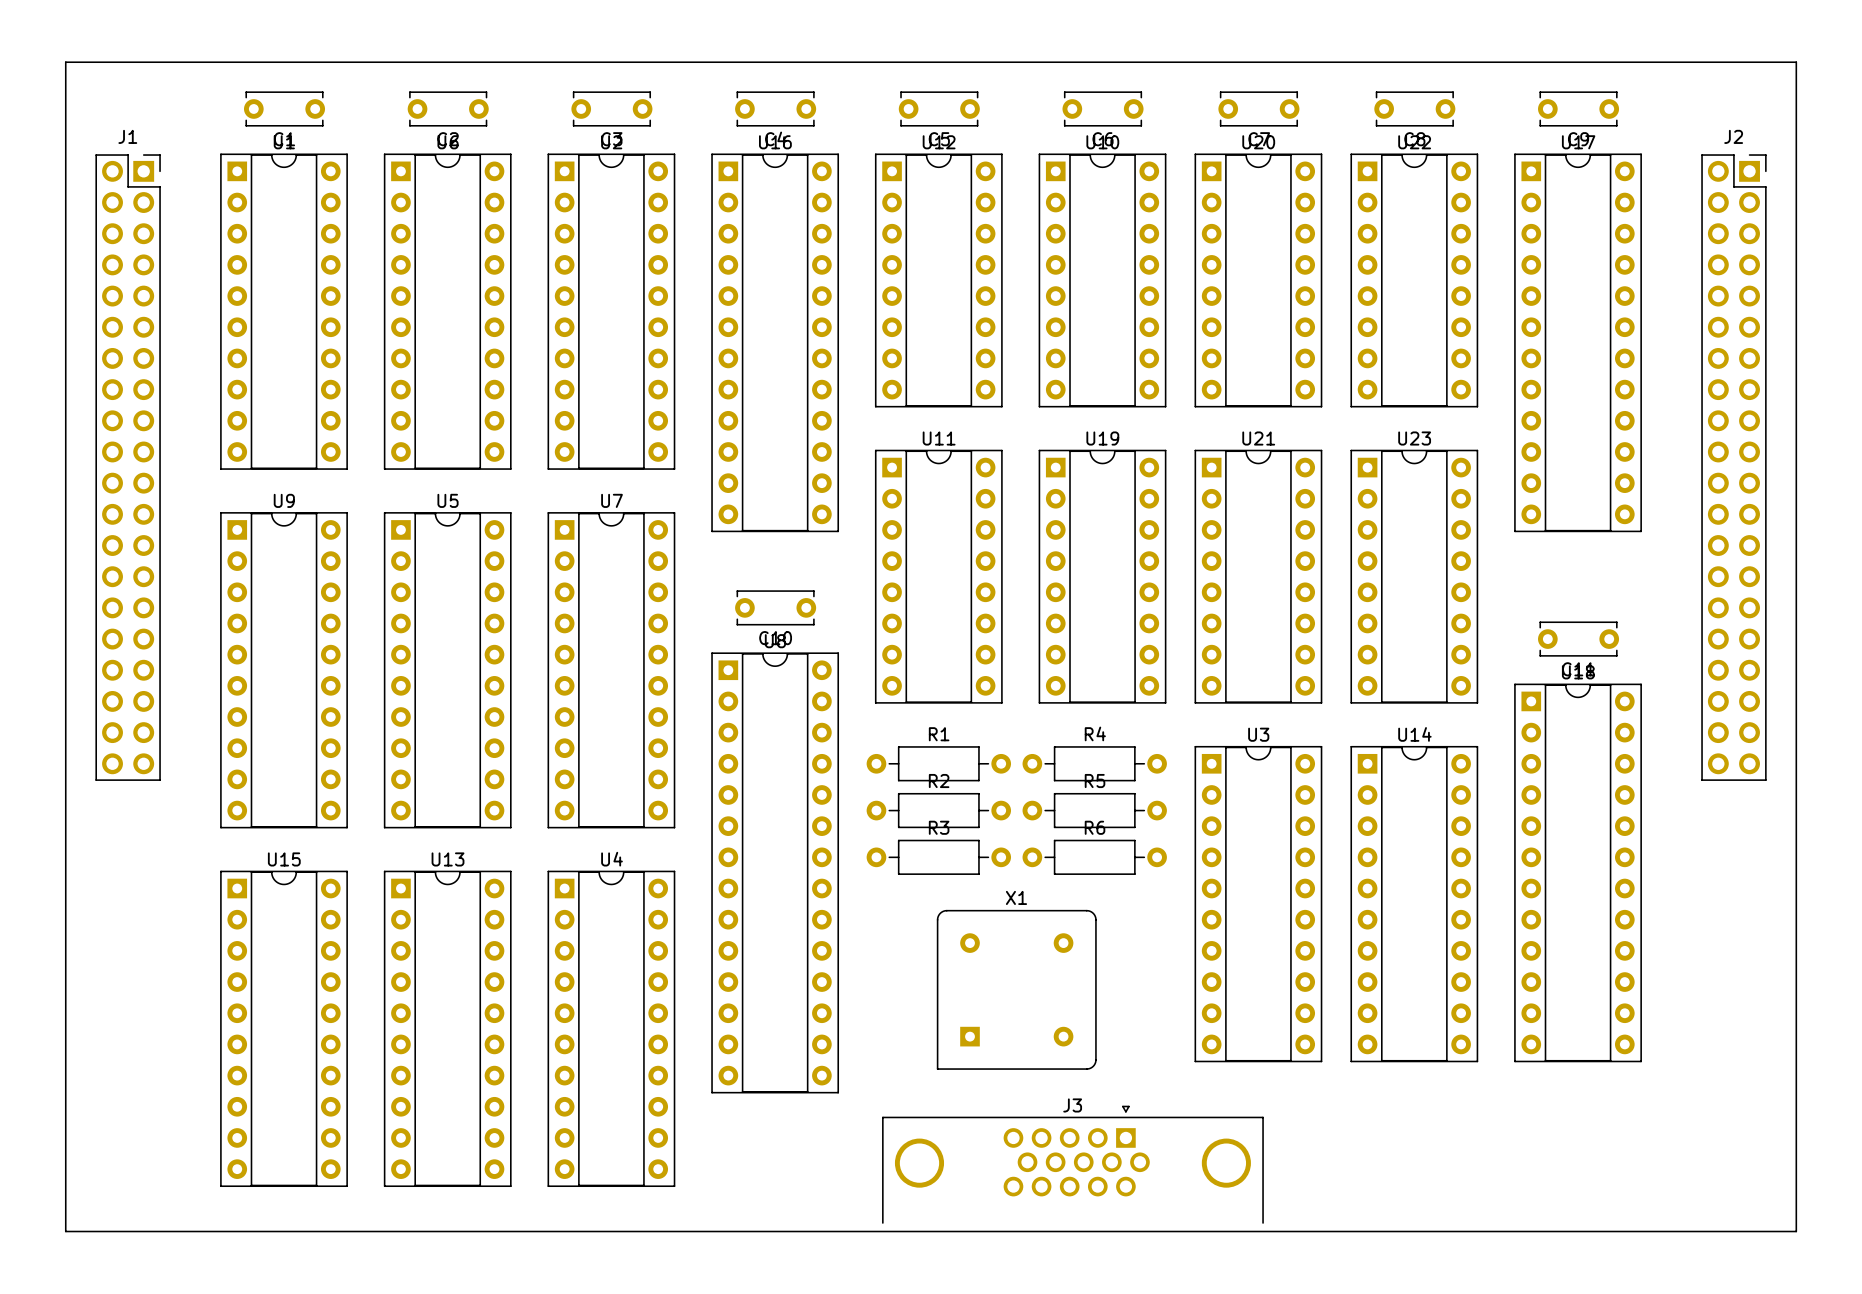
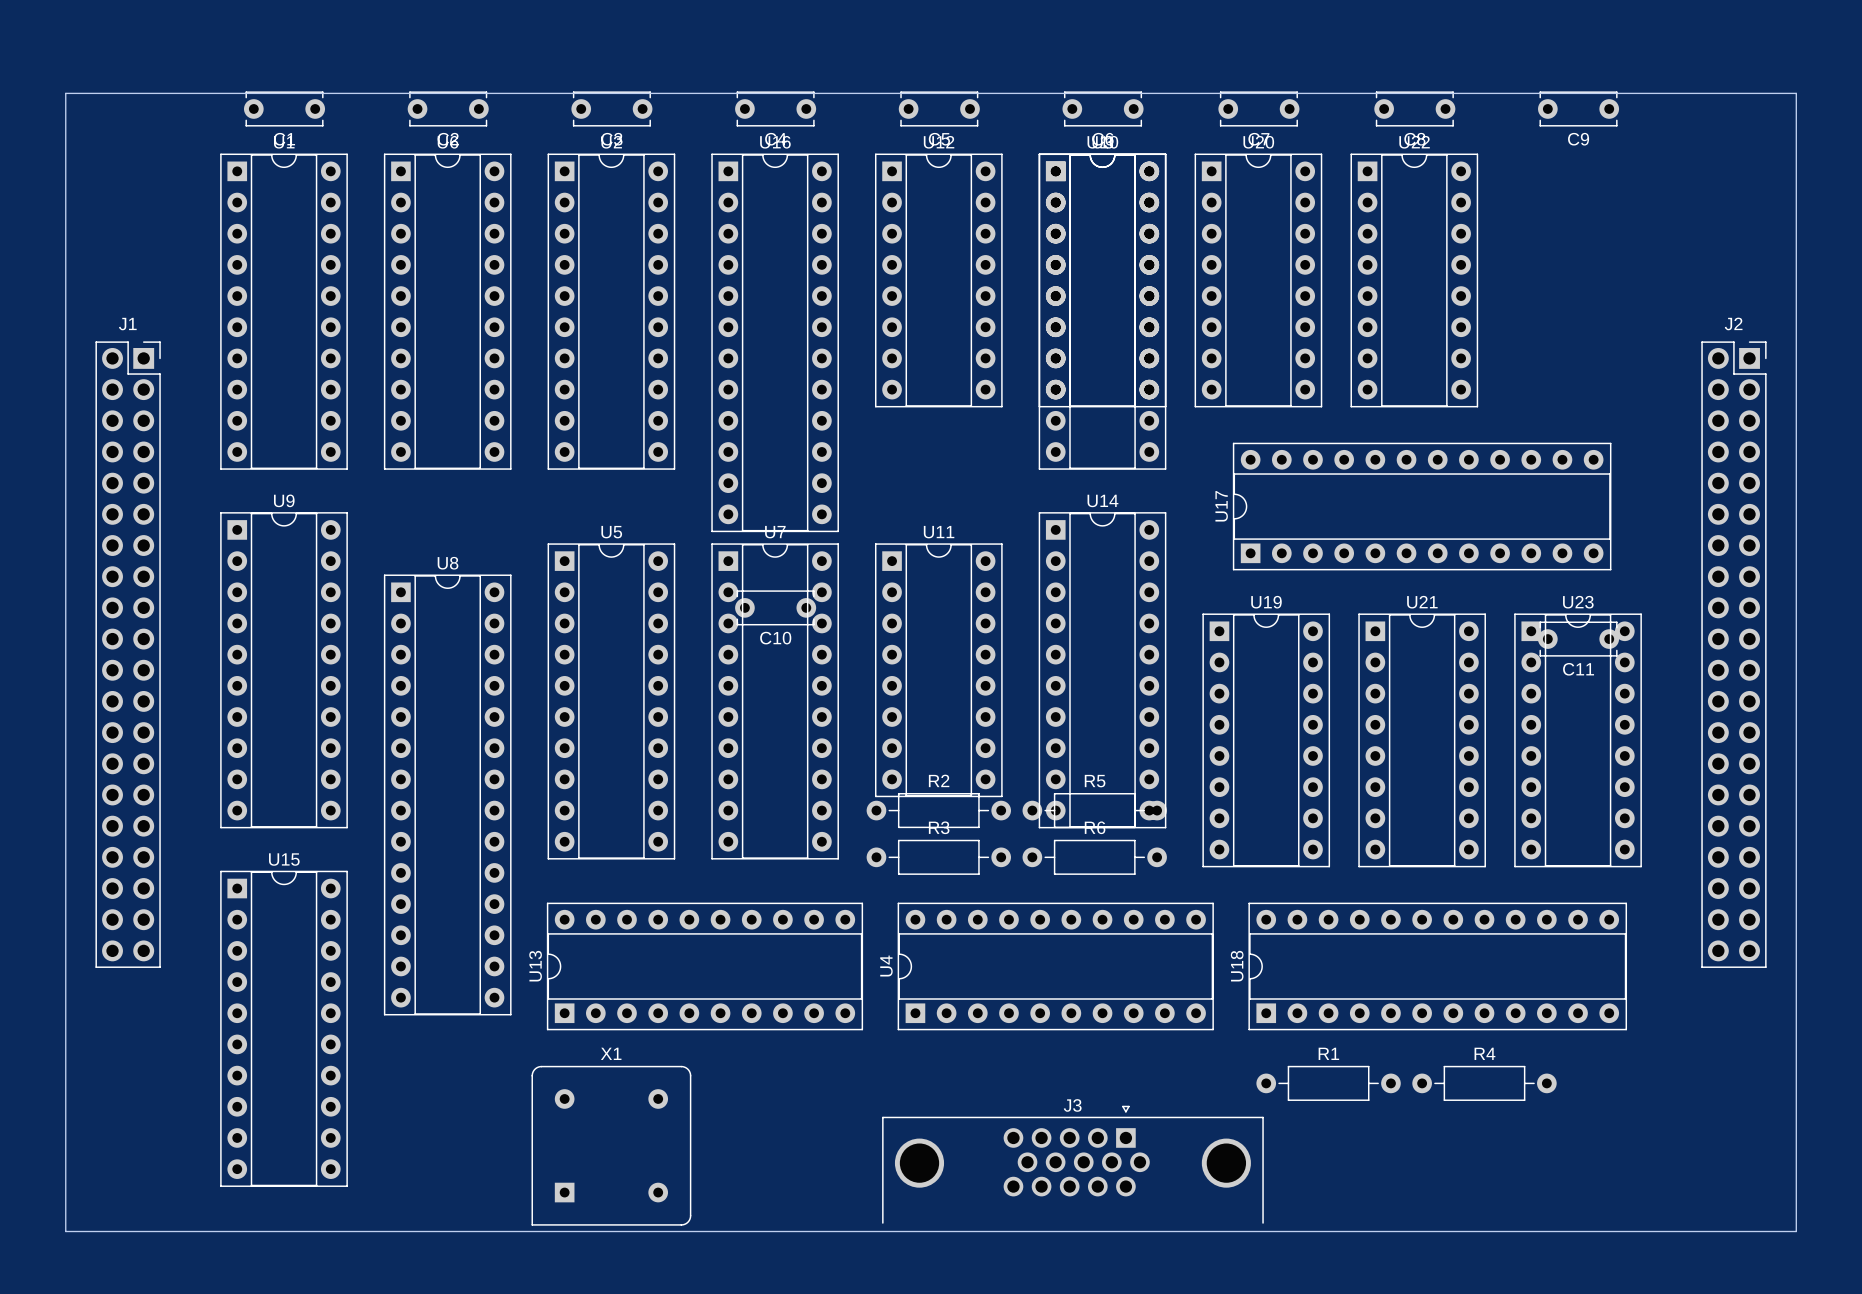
board edge: (65, 93) (65, 62) (1796, 62) (1796, 93) -> (65, 93) (1796, 93)
U17 rotation: 0° (1578, 342) -> 90° counterclockwise (1422, 506)
J1 position: (128, 467) -> (128, 654)
J2 position: (1733, 467) -> (1733, 654)
U11 position: (938, 576) -> (938, 670)
U19 position: (1102, 576) -> (1266, 740)
U21 position: (1258, 576) -> (1422, 740)
U23 position: (1414, 576) -> (1578, 740)
U5 position: (447, 670) -> (611, 701)
U7 position: (611, 670) -> (775, 701)
R1 position: (938, 763) -> (1328, 1083)
R4 position: (1094, 763) -> (1484, 1083)
U8 position: (775, 872) -> (447, 794)
U18 rotation: 0° (1578, 872) -> 90° counterclockwise (1437, 966)
U3 position: (1258, 904) -> (1102, 311)
U14 position: (1414, 904) -> (1102, 670)
X1 position: (1016, 989) -> (611, 1145)
U13 rotation: 0° (447, 1028) -> 90° counterclockwise (704, 966)
U13 position: (447, 1028) -> (704, 966)
U4 rotation: 0° (611, 1028) -> 90° counterclockwise (1055, 966)
U4 position: (611, 1028) -> (1055, 966)

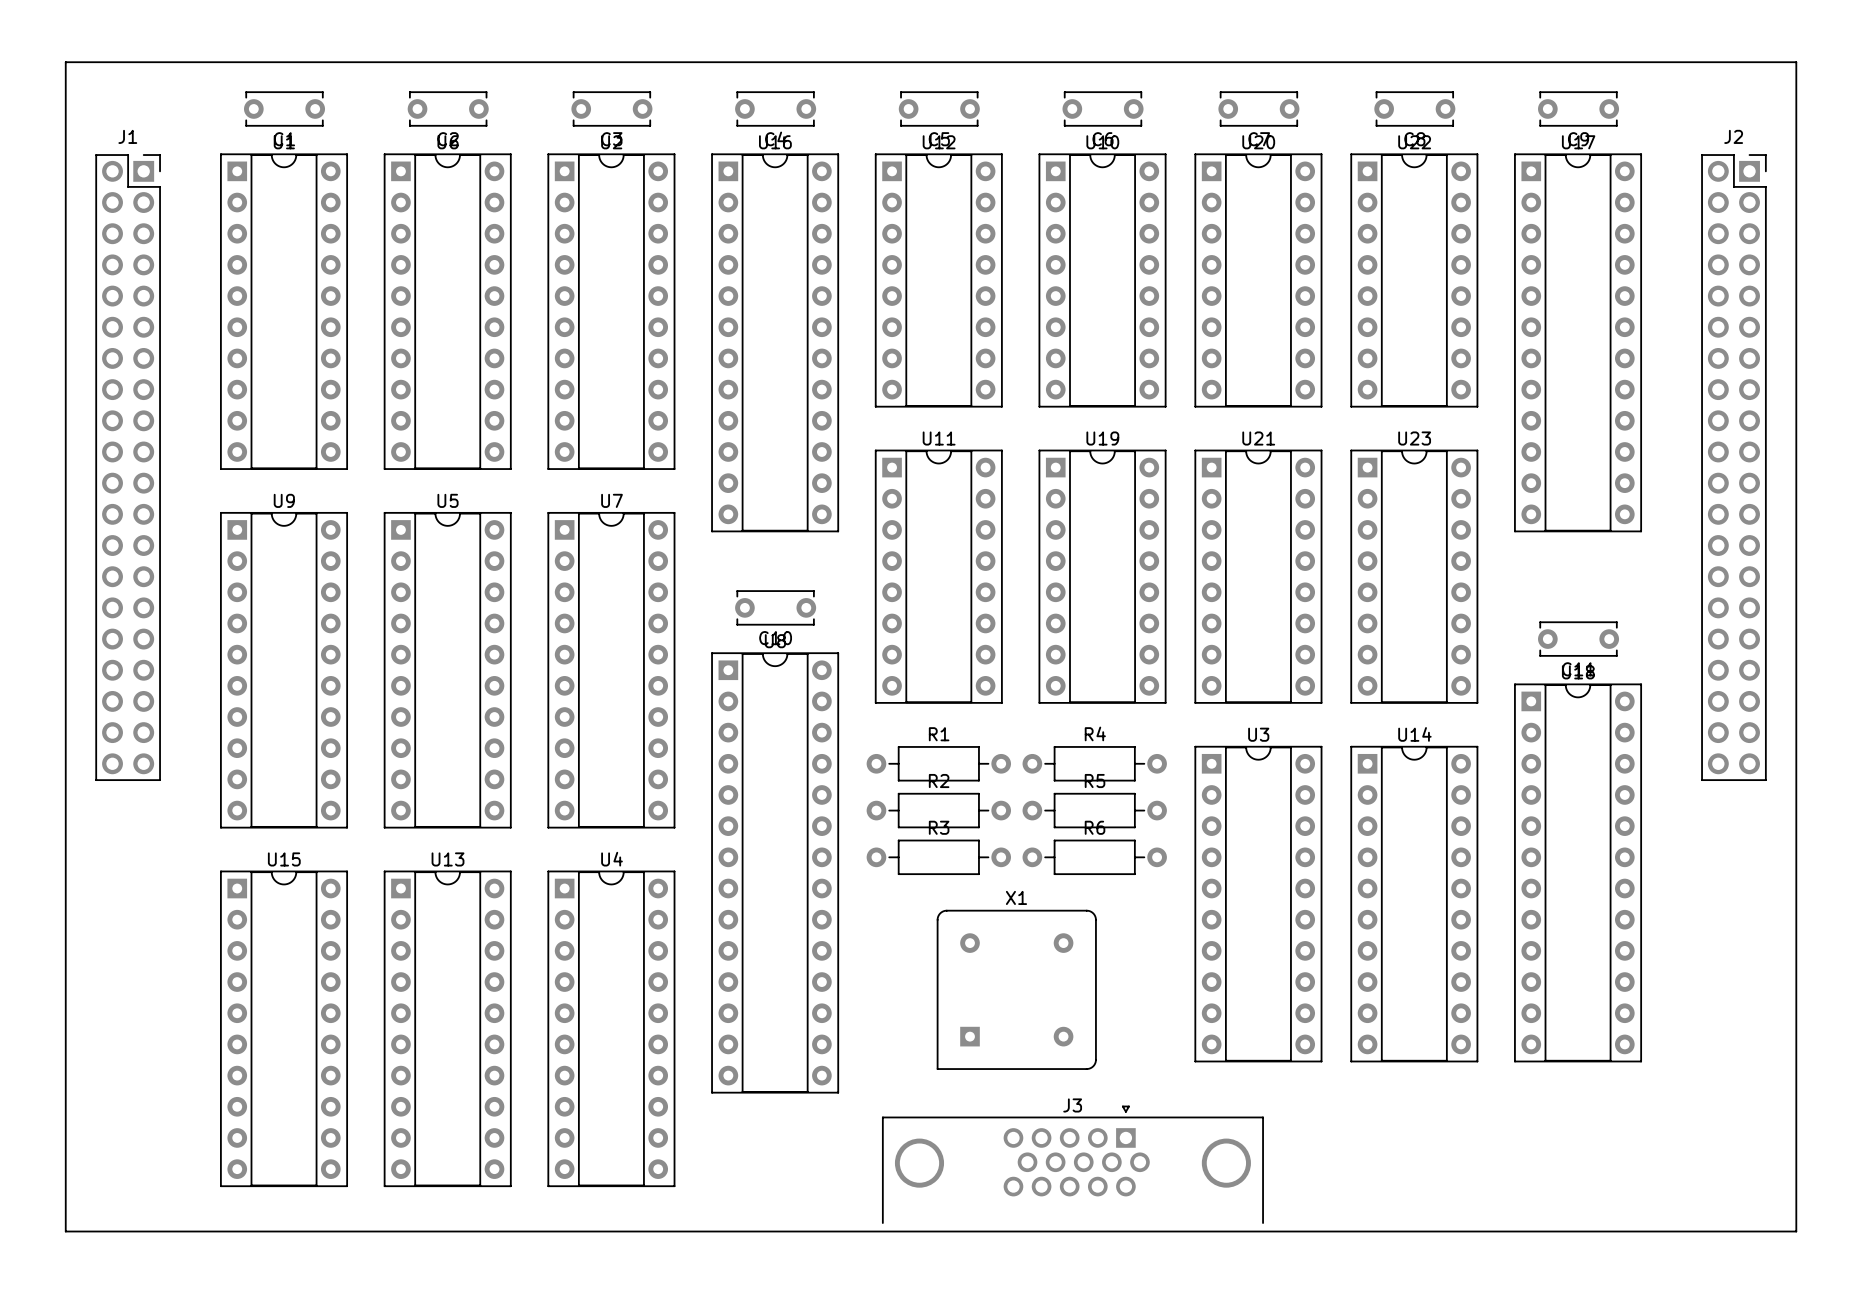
board edge: (65, 93) (1796, 93) -> (65, 93) (65, 62) (1796, 62) (1796, 93)
U3 position: (1102, 311) -> (1258, 904)
U17 rotation: 0° (1422, 506) -> 90° clockwise (1578, 342)
J1 position: (128, 654) -> (128, 467)
J2 position: (1733, 654) -> (1733, 467)
U11 position: (938, 670) -> (938, 576)
U14 position: (1102, 670) -> (1414, 904)
U5 position: (611, 701) -> (447, 670)
U7 position: (775, 701) -> (611, 670)
U19 position: (1266, 740) -> (1102, 576)
U21 position: (1422, 740) -> (1258, 576)
U23 position: (1578, 740) -> (1414, 576)
U8 position: (447, 794) -> (775, 872)
U13 rotation: 0° (704, 966) -> 90° clockwise (447, 1028)
U13 position: (704, 966) -> (447, 1028)
U4 rotation: 0° (1055, 966) -> 90° clockwise (611, 1028)
U4 position: (1055, 966) -> (611, 1028)
U18 rotation: 0° (1437, 966) -> 90° clockwise (1578, 872)
R1 position: (1328, 1083) -> (938, 763)
R4 position: (1484, 1083) -> (1094, 763)
X1 position: (611, 1145) -> (1016, 989)

